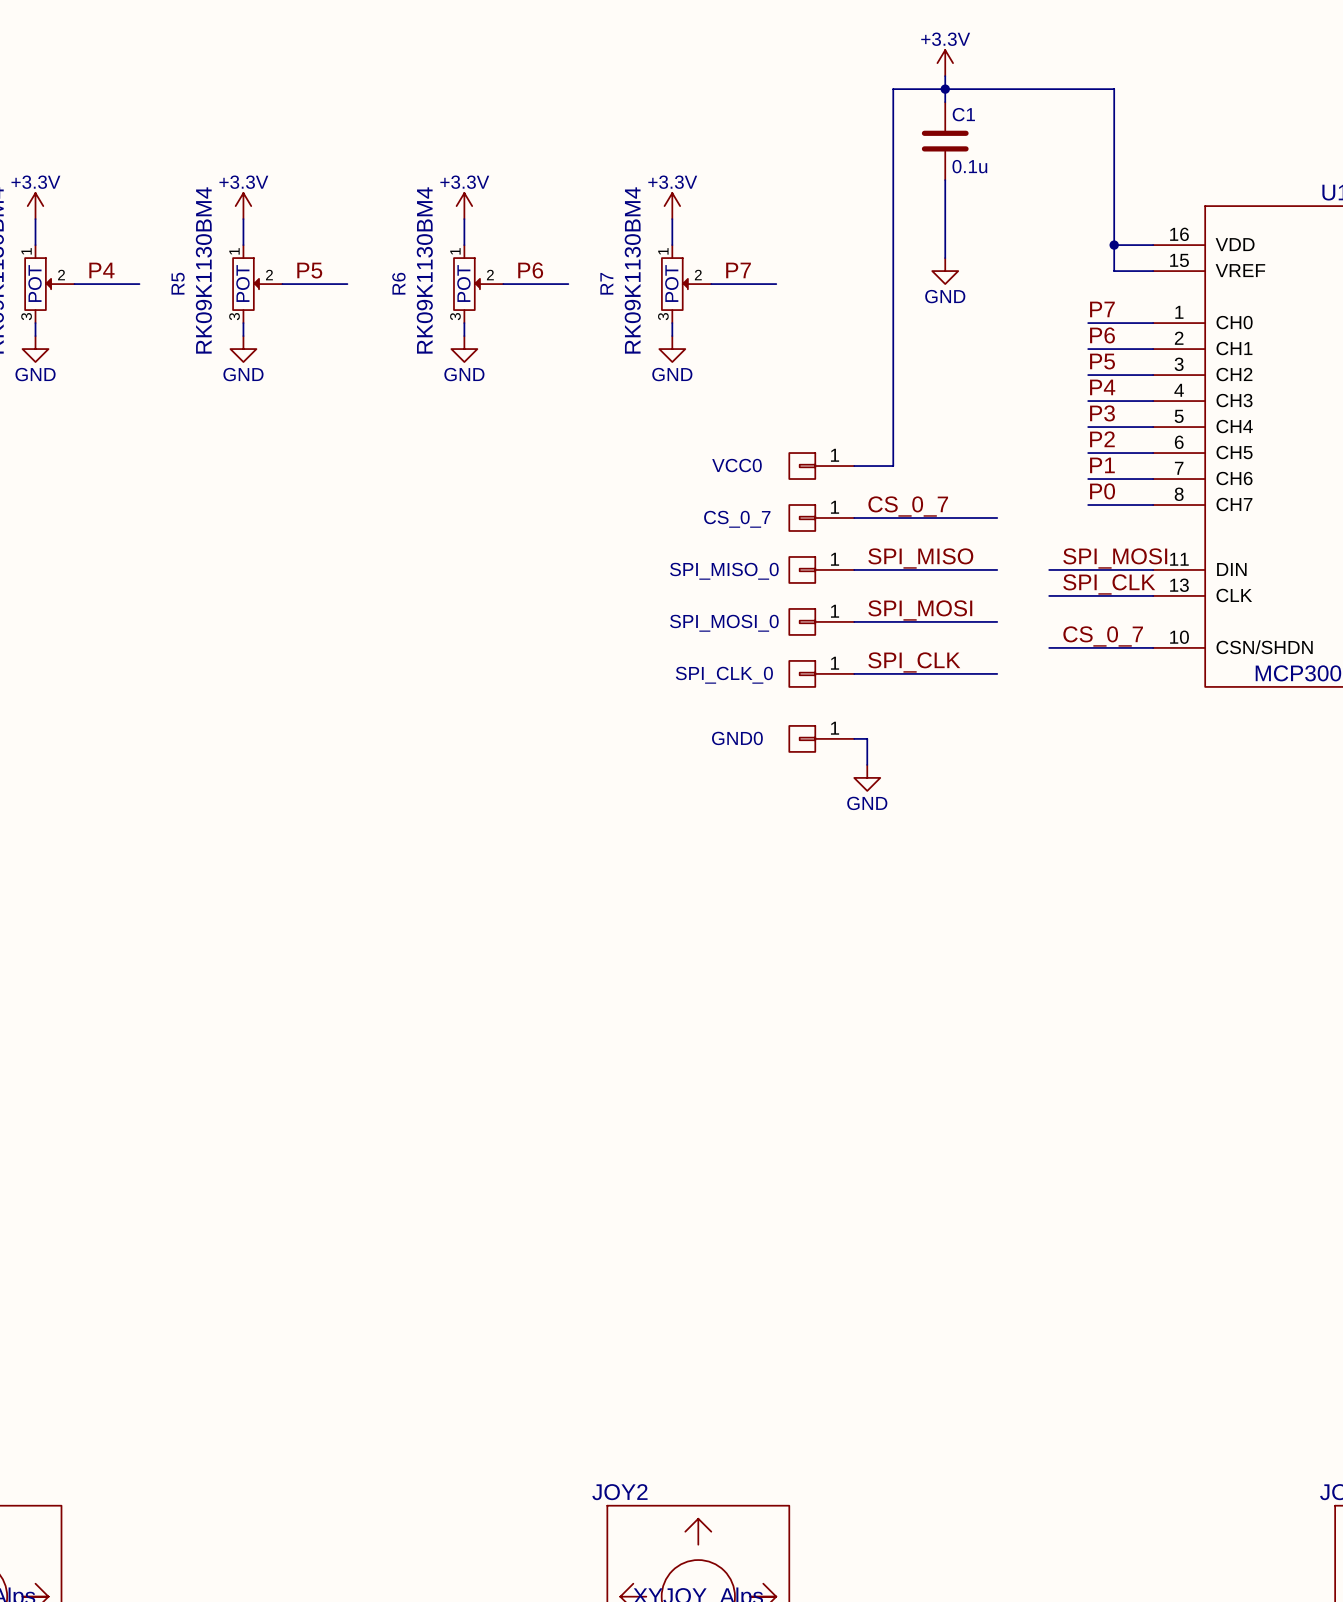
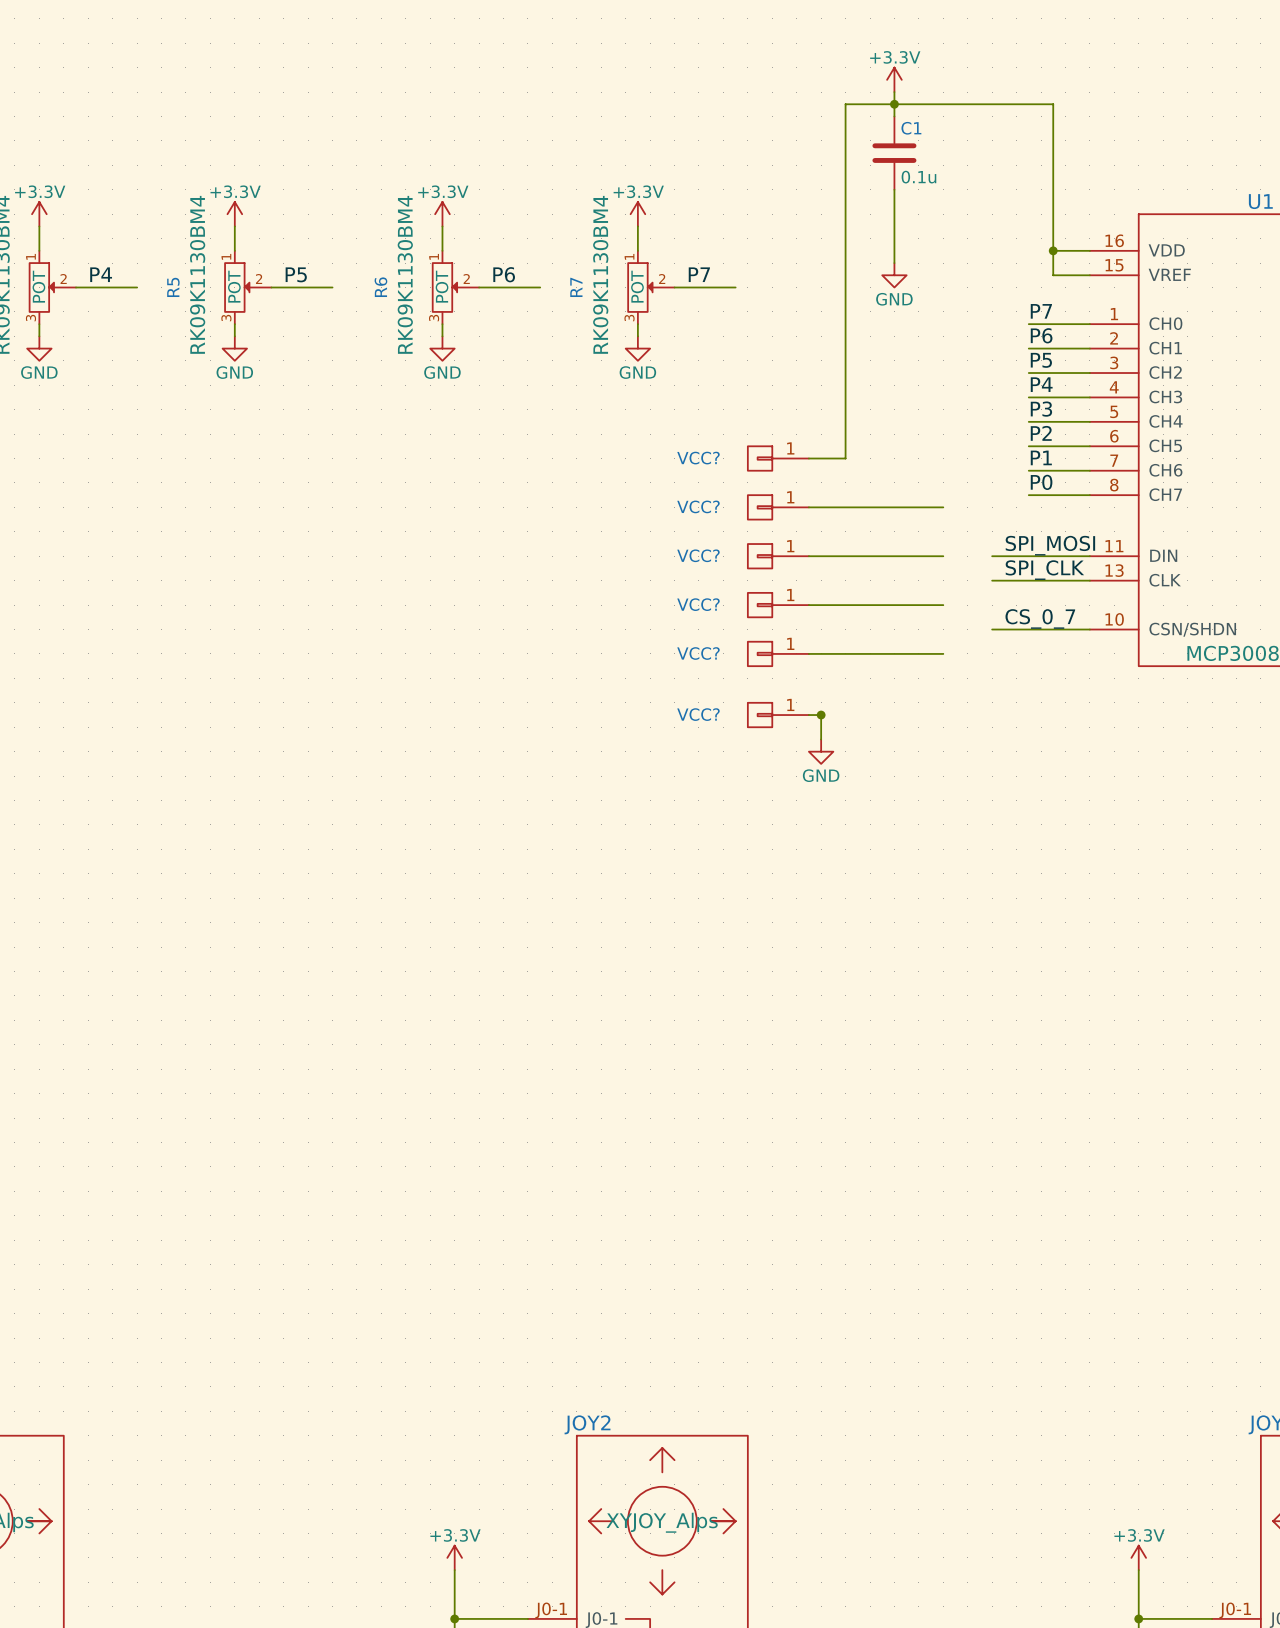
VCC0 name: VCC0 (736, 465) -> VCC? (698, 458)
label: CS_0_7 (908, 506) -> none
CS_0_7 name: CS_0_7 (737, 519) -> VCC? (698, 506)
label: SPI_MISO (920, 558) -> none
SPI_MISO_0 name: SPI_MISO_0 (724, 571) -> VCC? (698, 555)
label: SPI_MOSI (920, 610) -> none
SPI_MOSI_0 name: SPI_MOSI_0 (724, 623) -> VCC? (698, 604)
label: SPI_CLK (914, 662) -> none
SPI_CLK_0 name: SPI_CLK_0 (724, 675) -> VCC? (698, 653)
GND0 name: GND0 (737, 738) -> VCC? (698, 714)
junction: none -> (821, 715)

